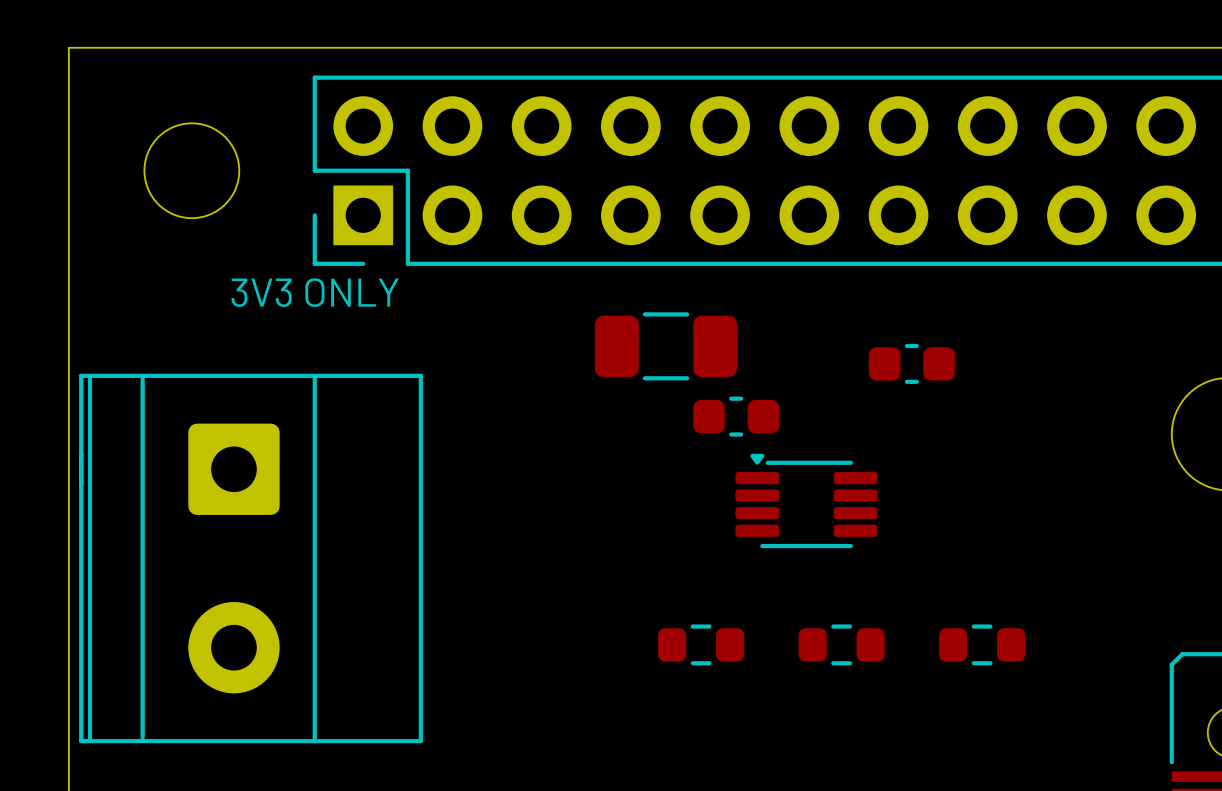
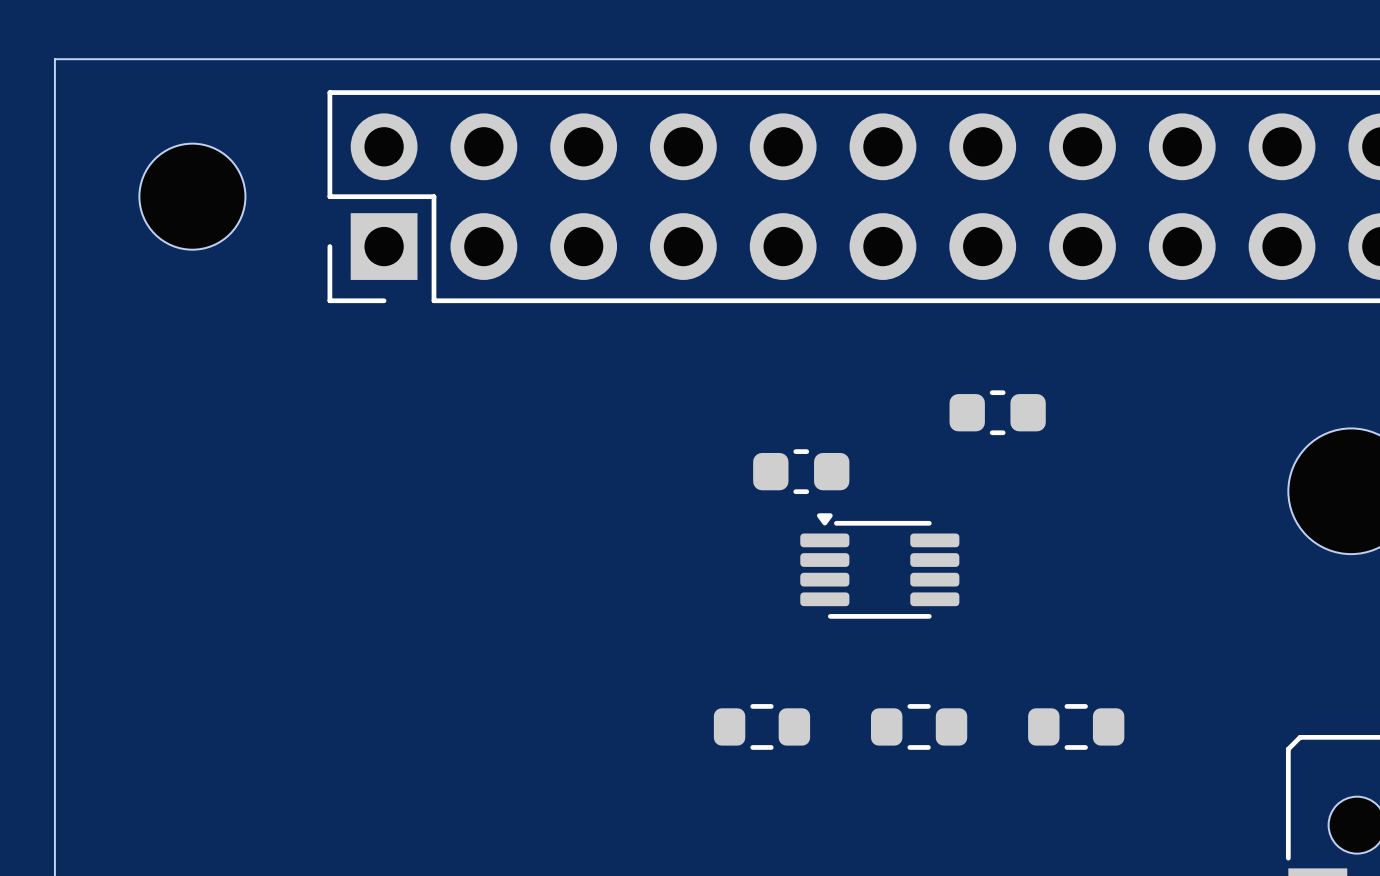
text: 3V3 ONLY (315, 292) -> none
part: (666, 346) -> none
part: (251, 558) -> none

